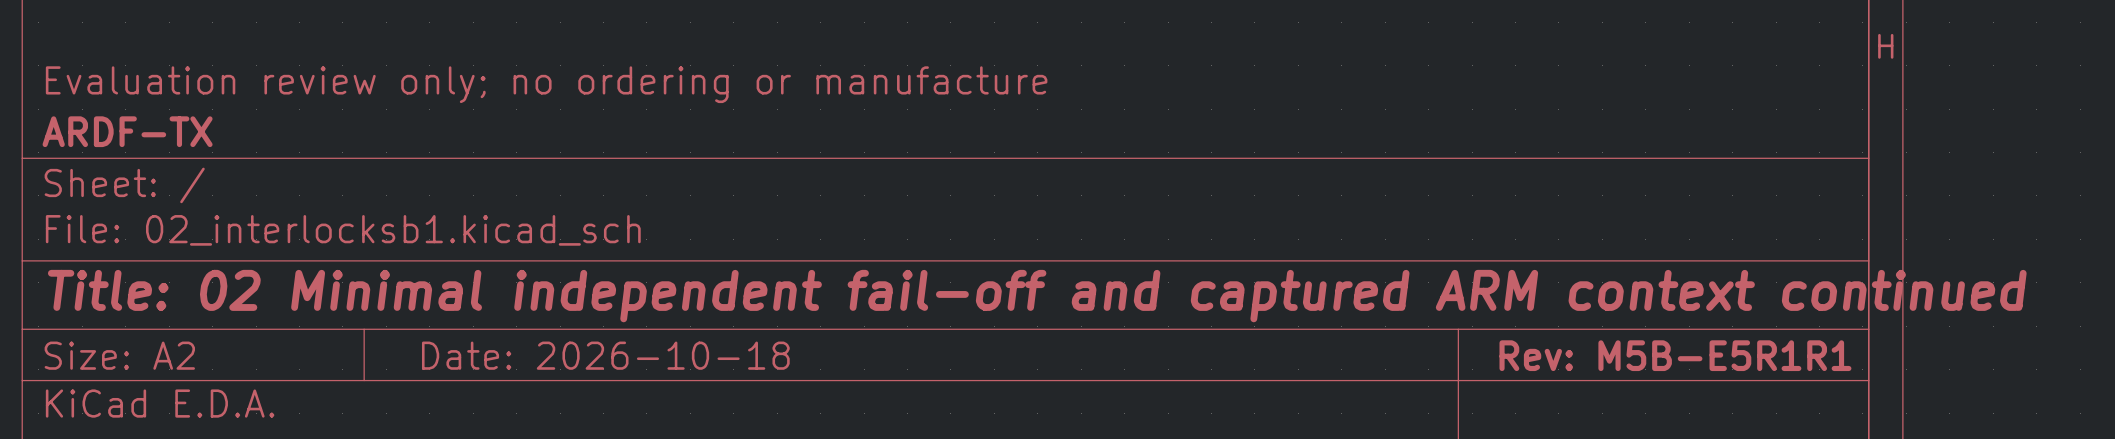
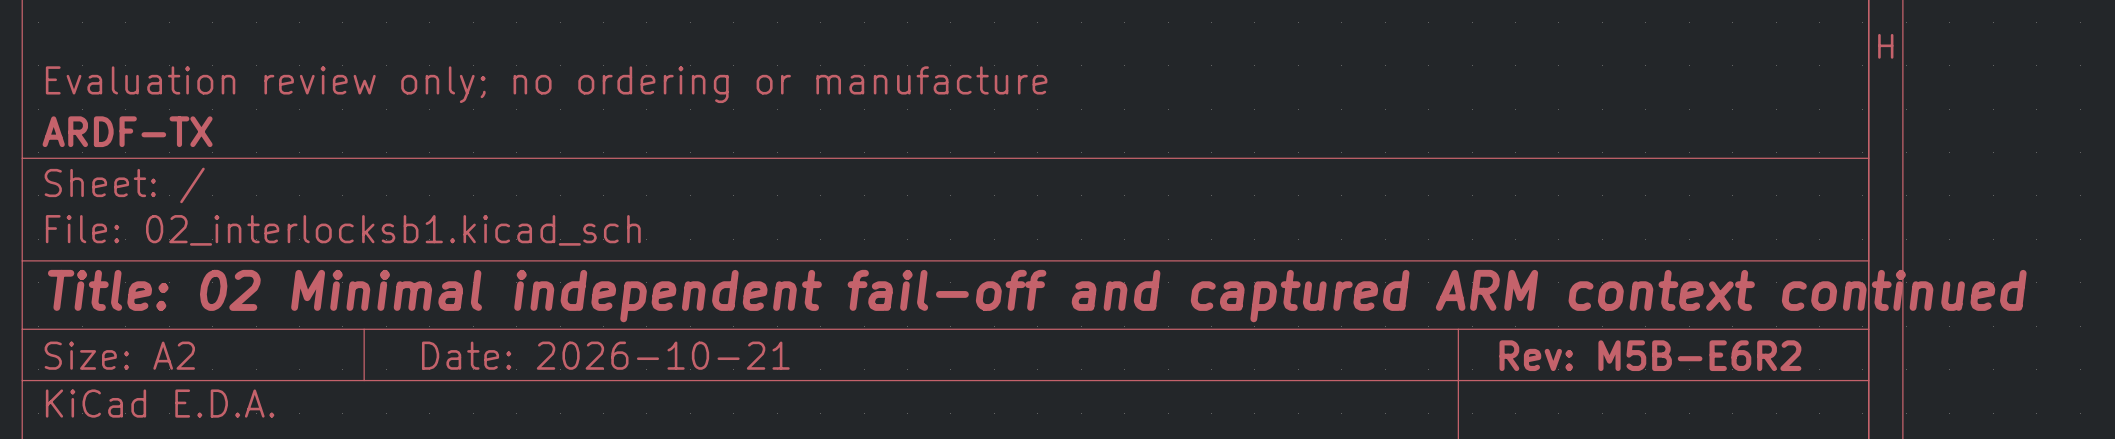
title block: Date: 2026-10-18 (605, 355) -> Date: 2026-10-21 (605, 355)
title block: Rev: M5B-E5R1R1 (1675, 355) -> Rev: M5B-E6R2 (1650, 355)

